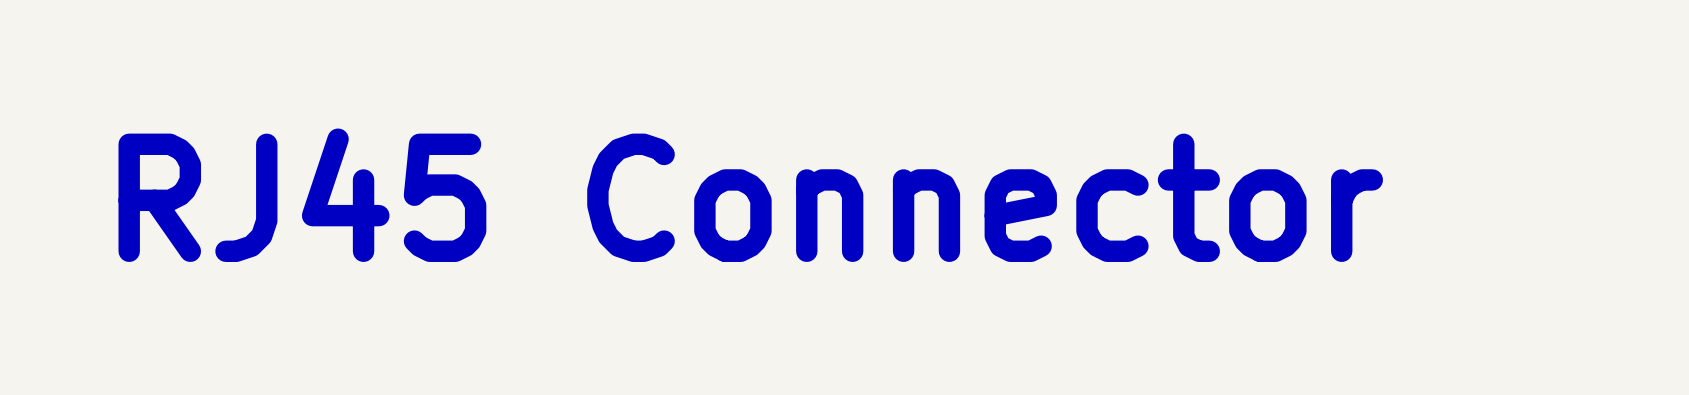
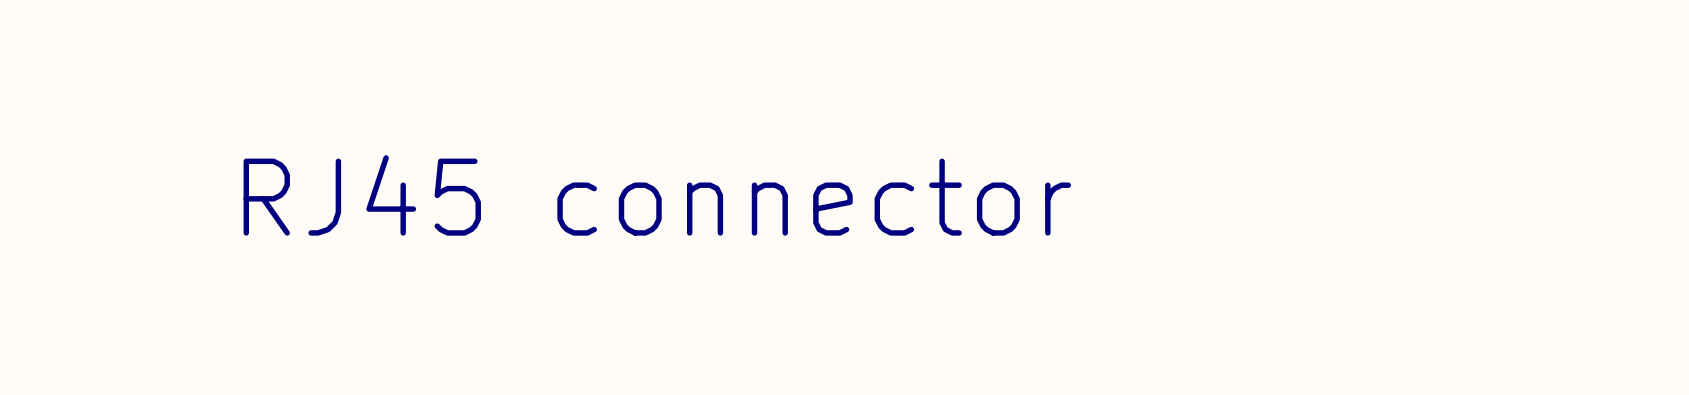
text: RJ45 Connector (750, 195) -> RJ45 connector (657, 195)

